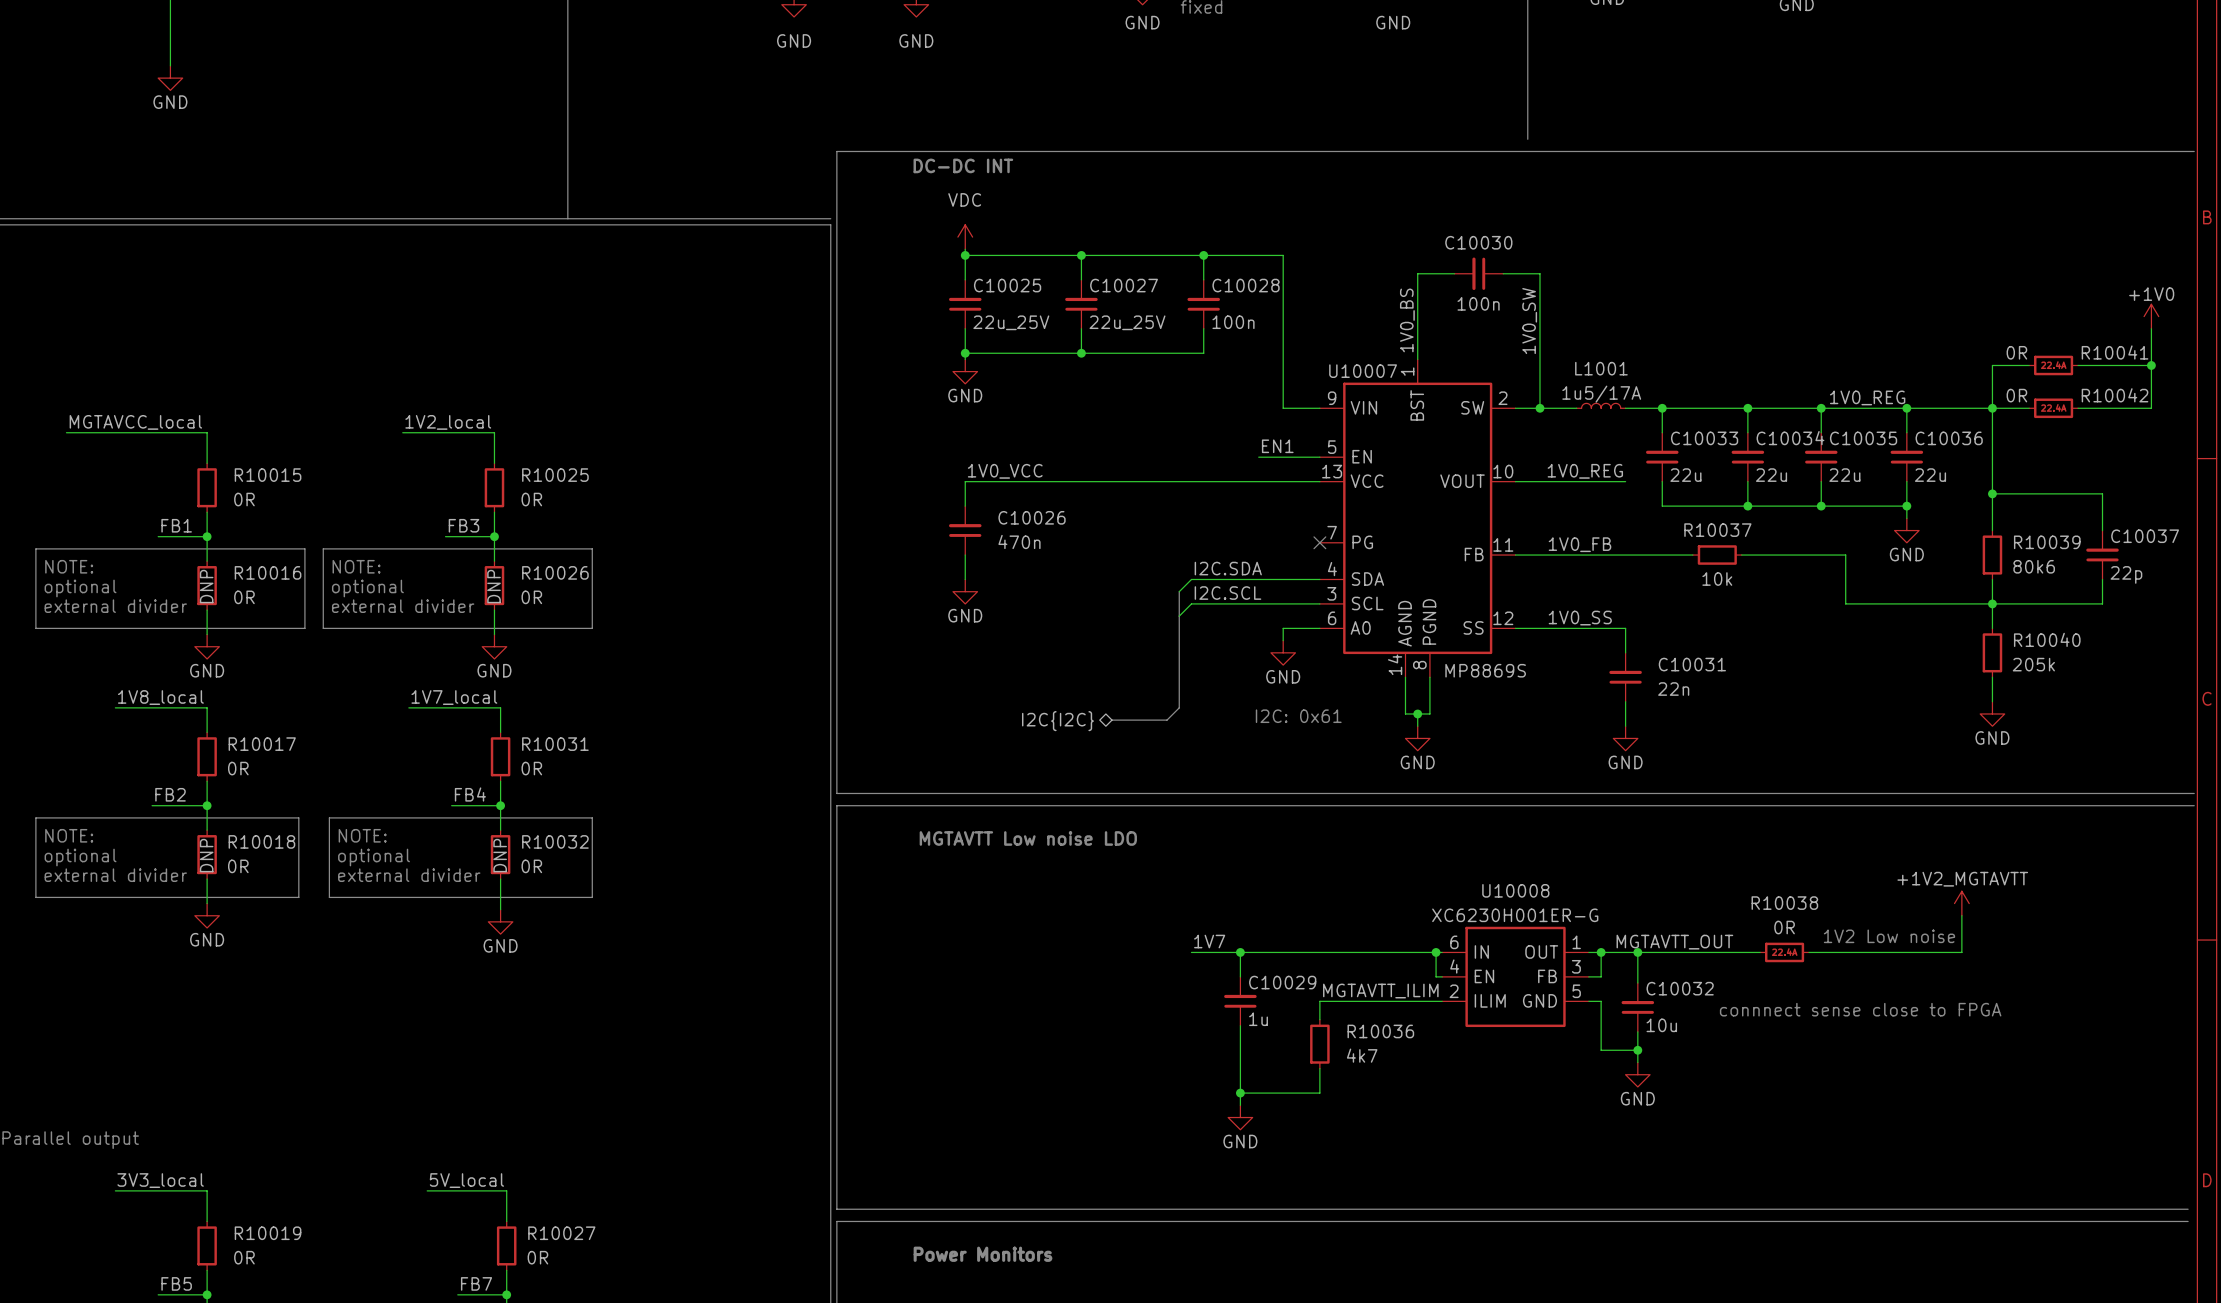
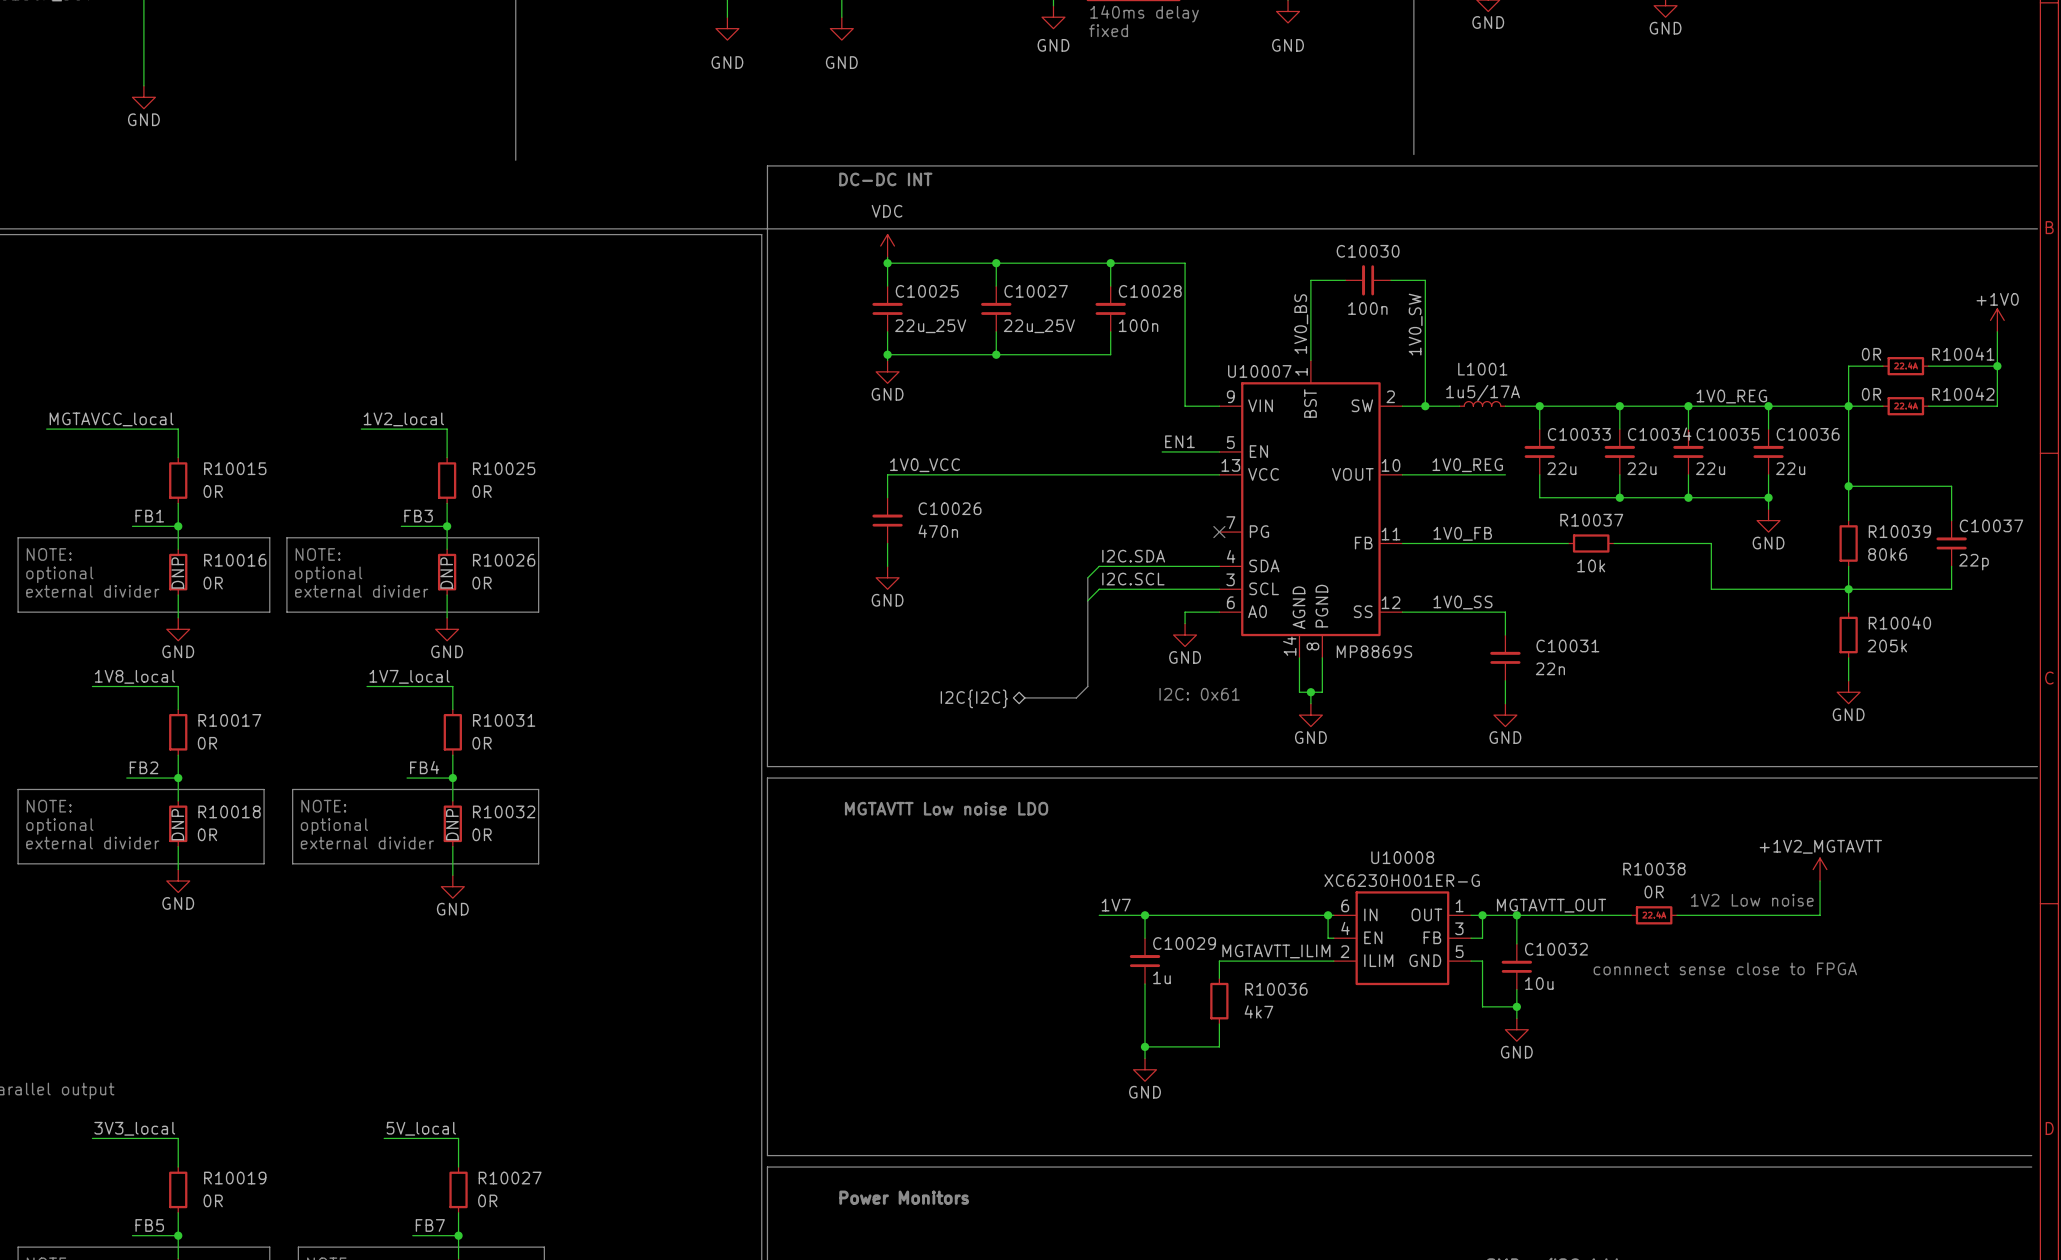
line: (567, 145) (567, 218) -> none
line: none -> (761, 228) (2037, 228)

